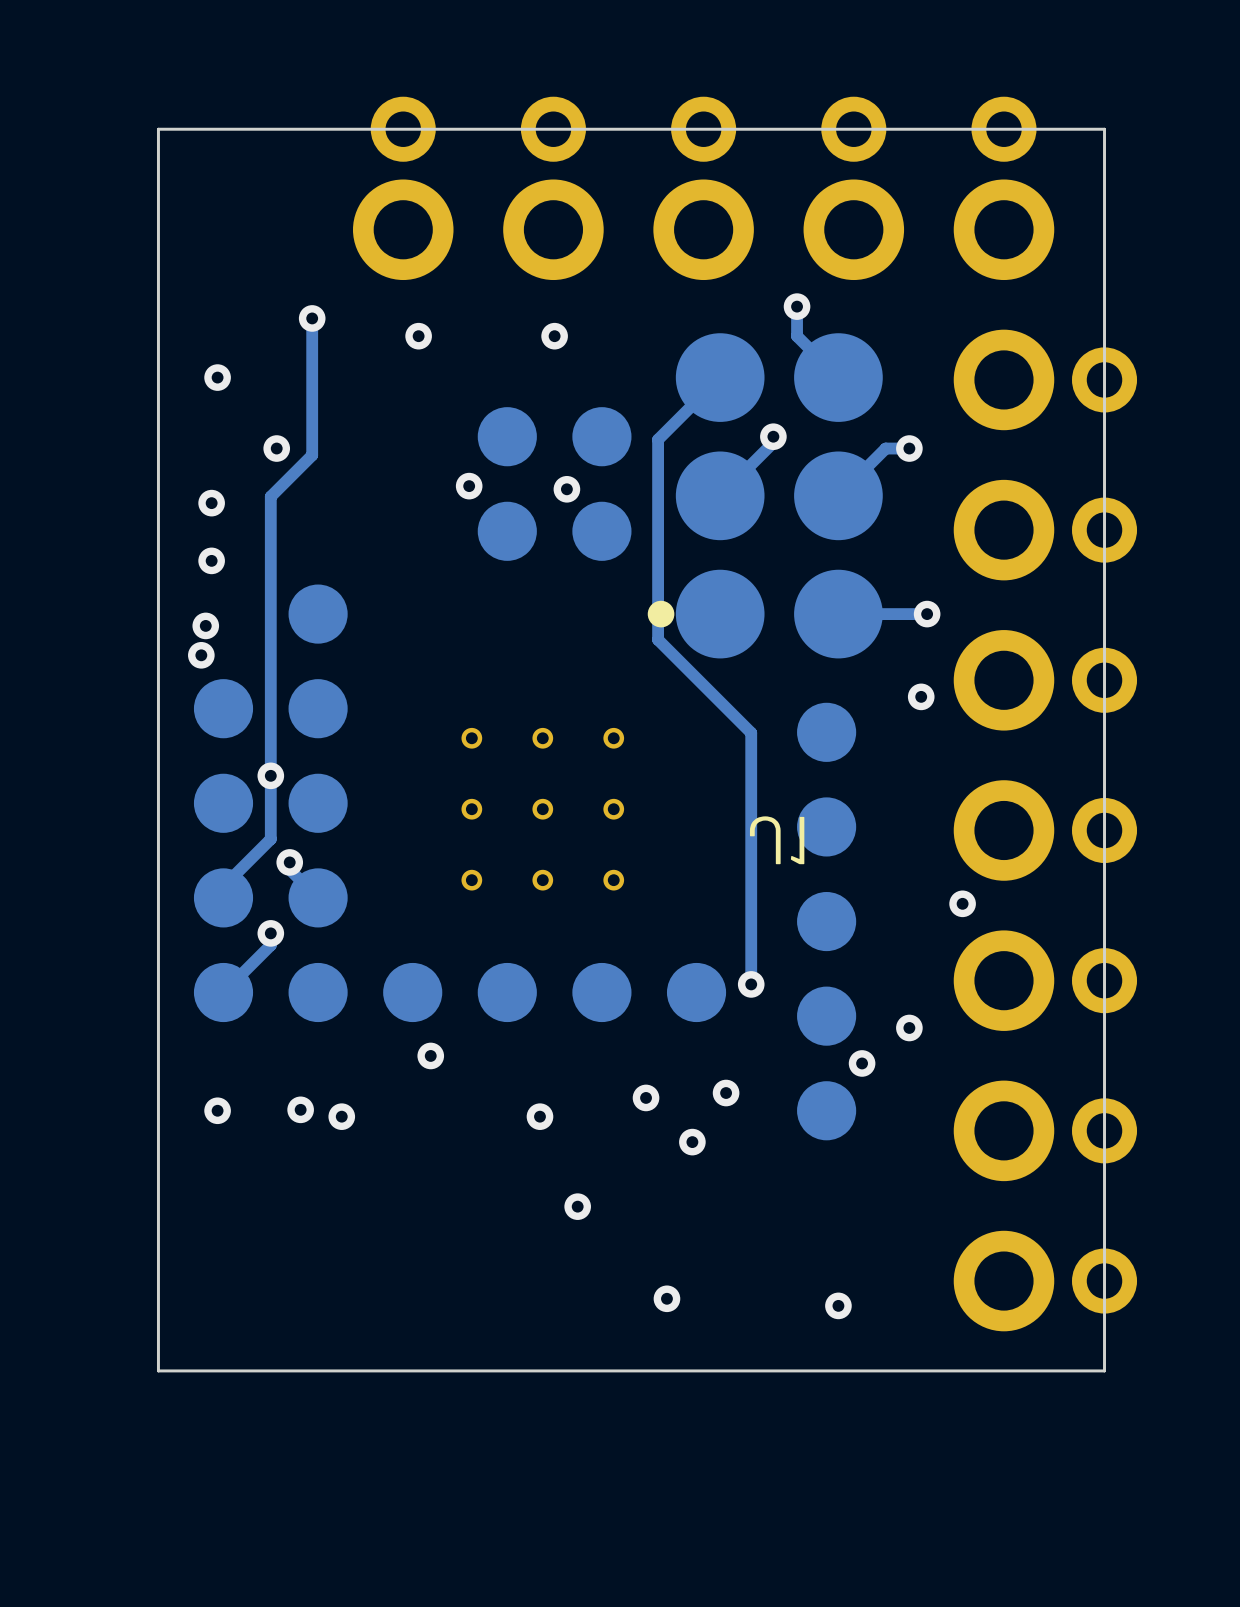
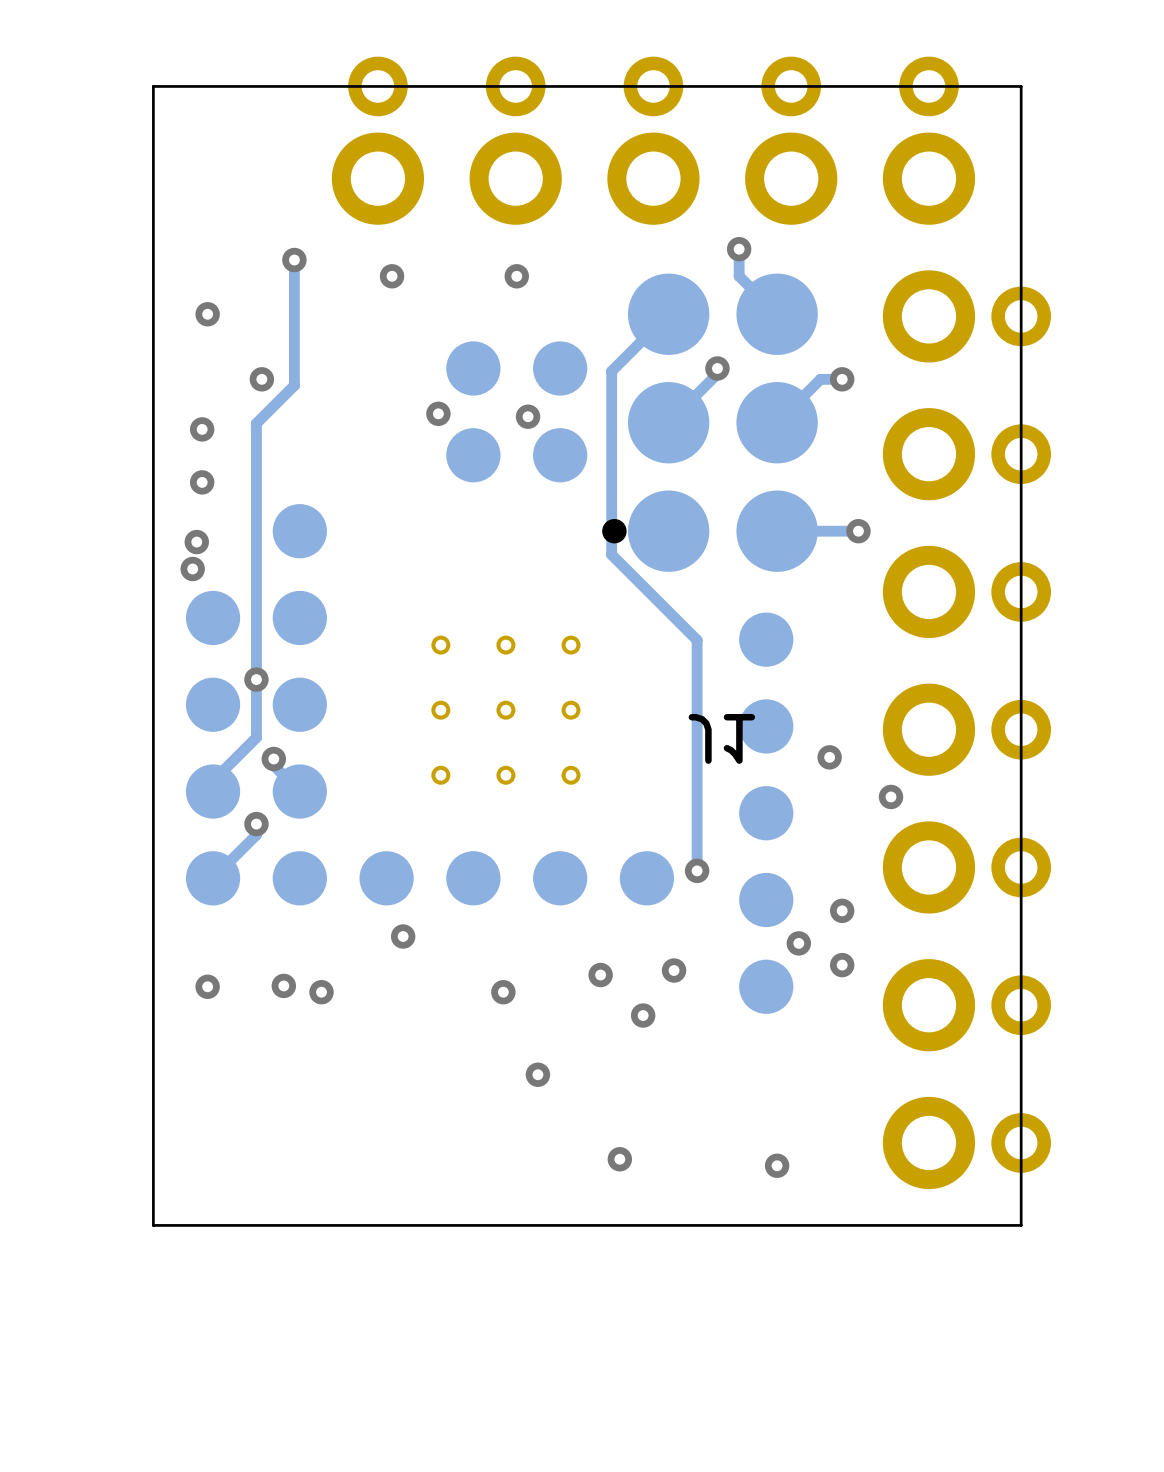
via position: (921, 696) -> (829, 757)
via: none -> (842, 965)

